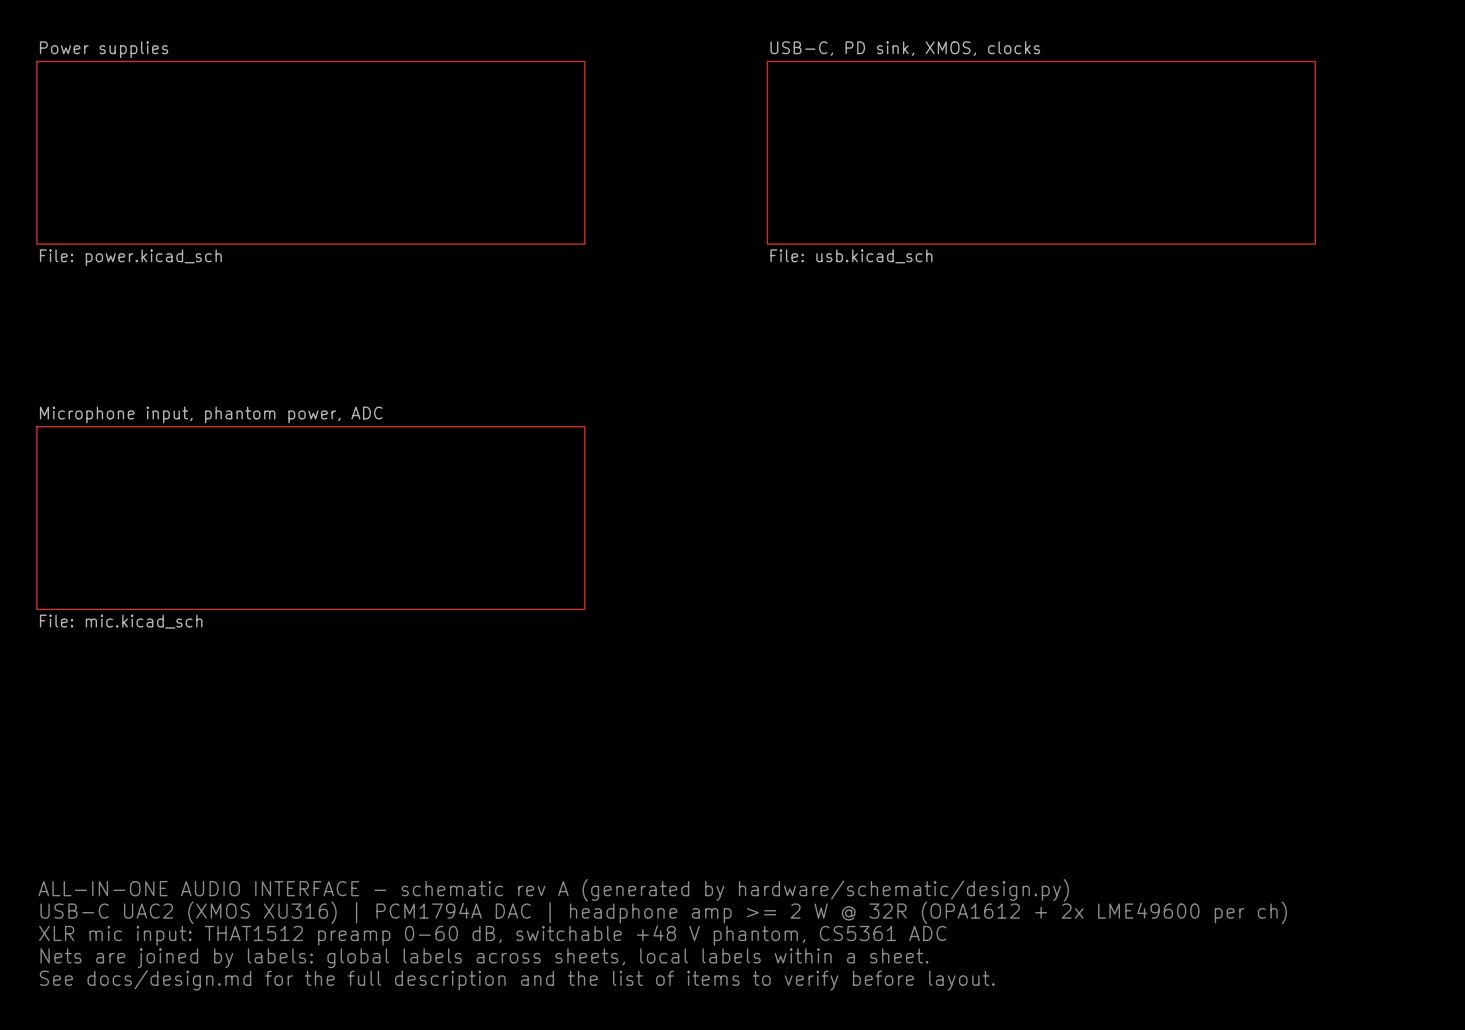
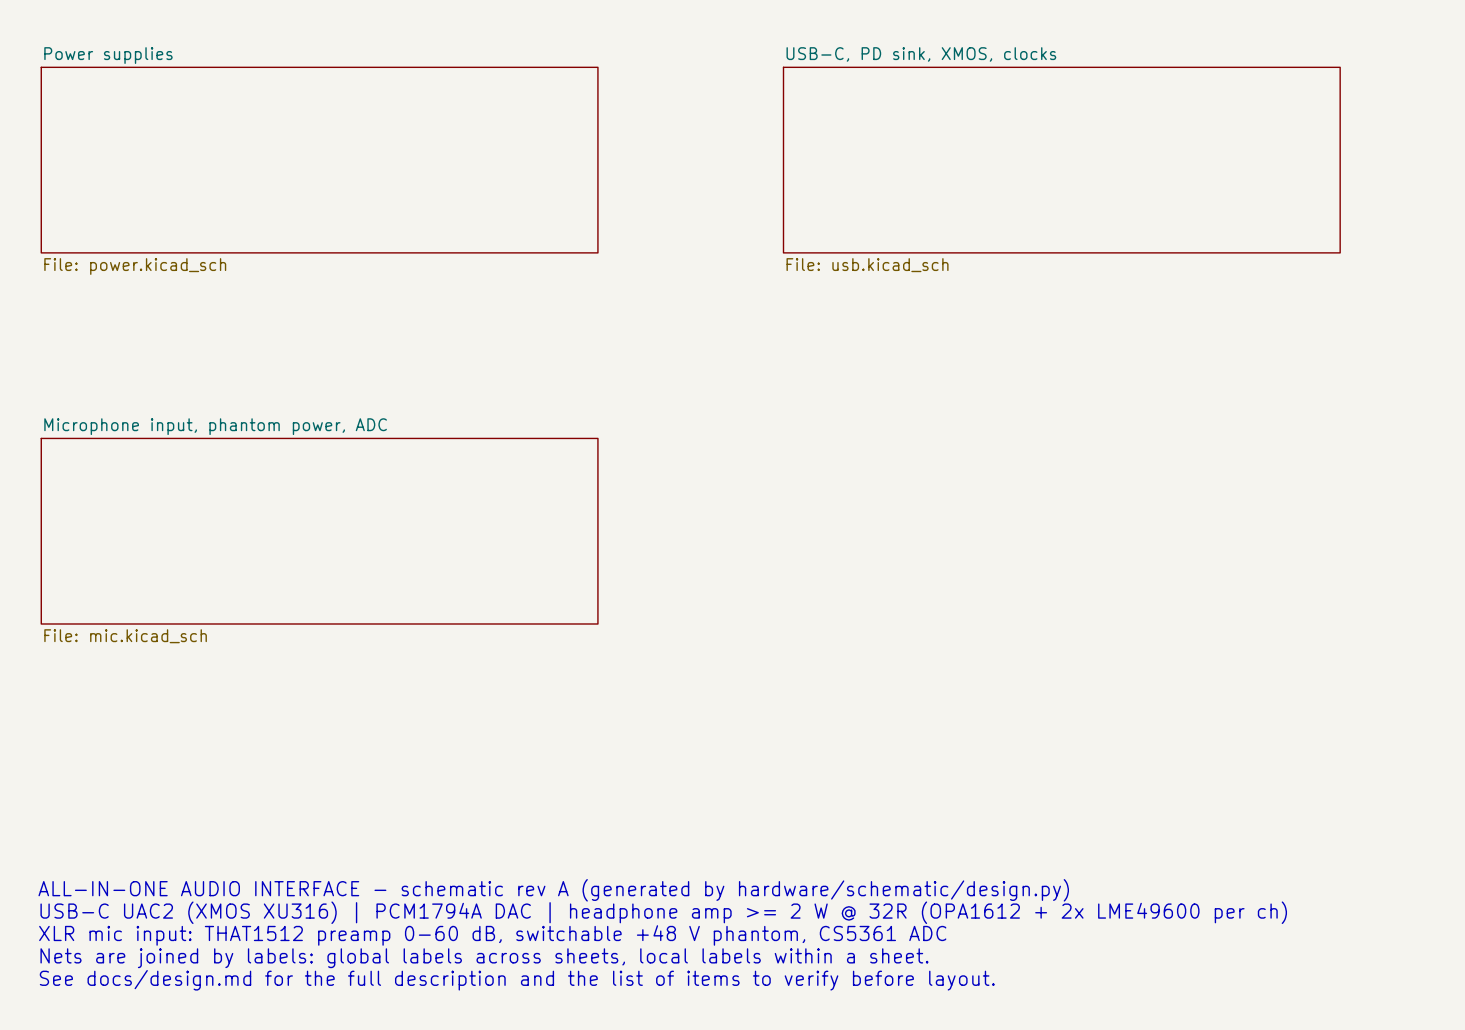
sheet Power supplies: File: power.kicad_sch (310, 152) -> none
sheet USB-C, PD sink, XMOS, clocks: File: usb.kicad_sch (1041, 152) -> none
sheet Power supplies: none -> File: power.kicad_sch (319, 160)
sheet USB-C, PD sink, XMOS, clocks: none -> File: usb.kicad_sch (1061, 160)
sheet Microphone input, phantom power, ADC: File: mic.kicad_sch (310, 518) -> none
sheet Microphone input, phantom power, ADC: none -> File: mic.kicad_sch (319, 531)

